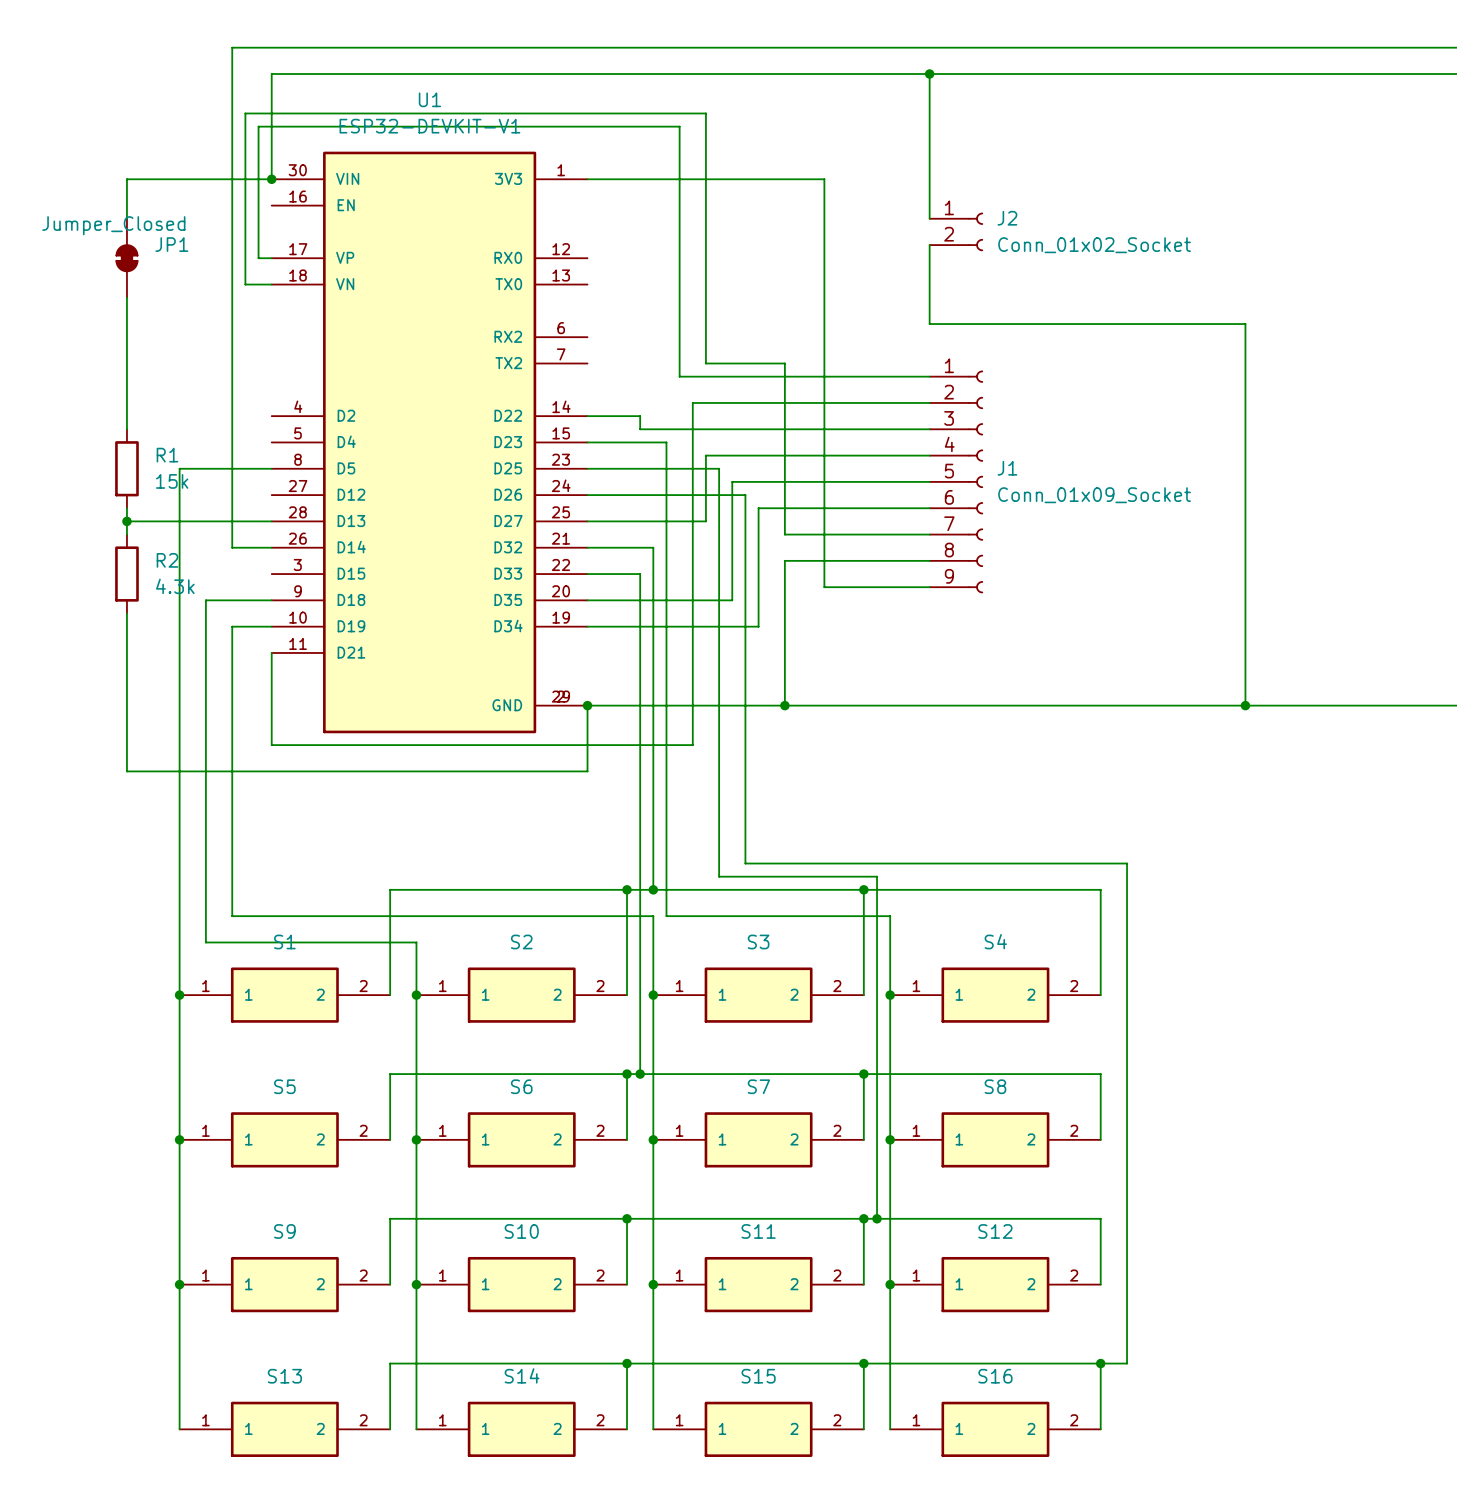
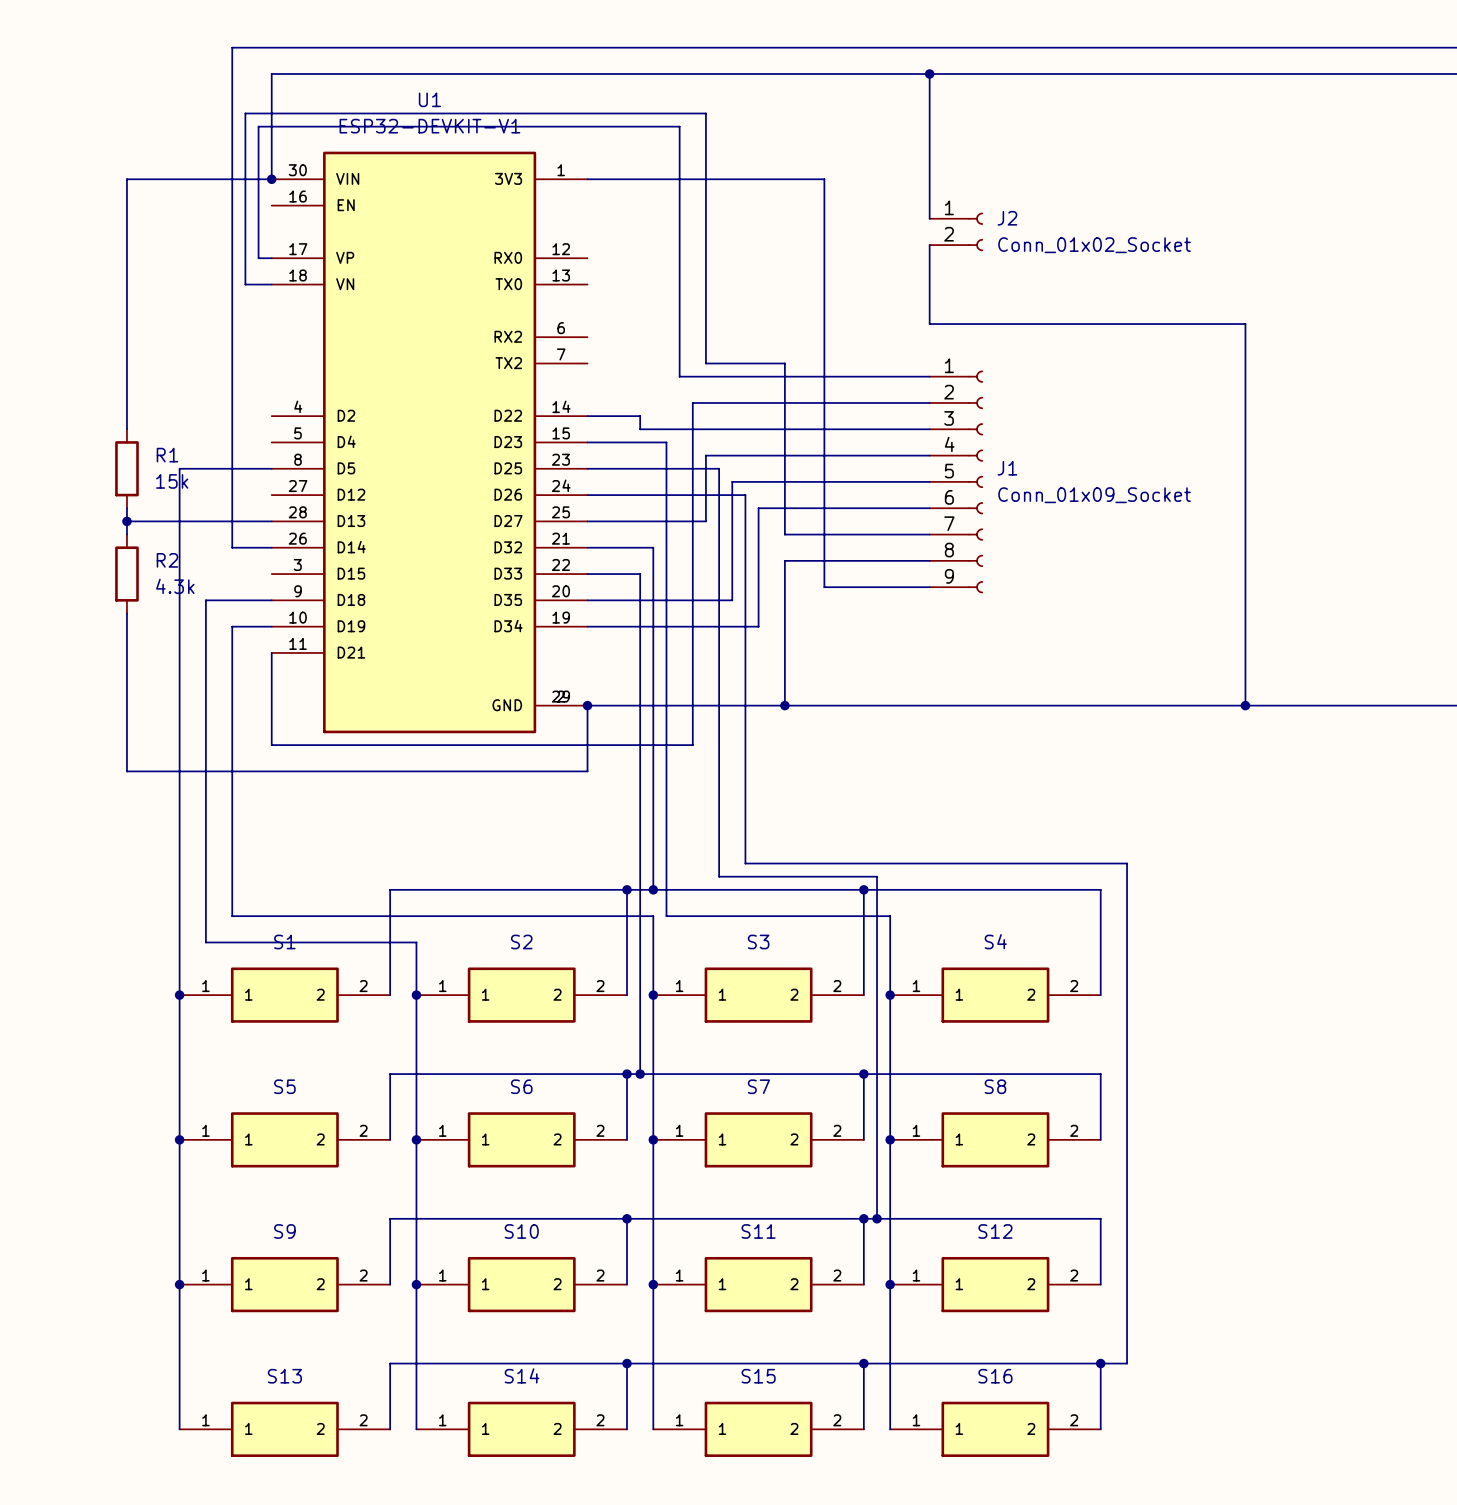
JP1: Jumper_Closed (126, 258) -> none

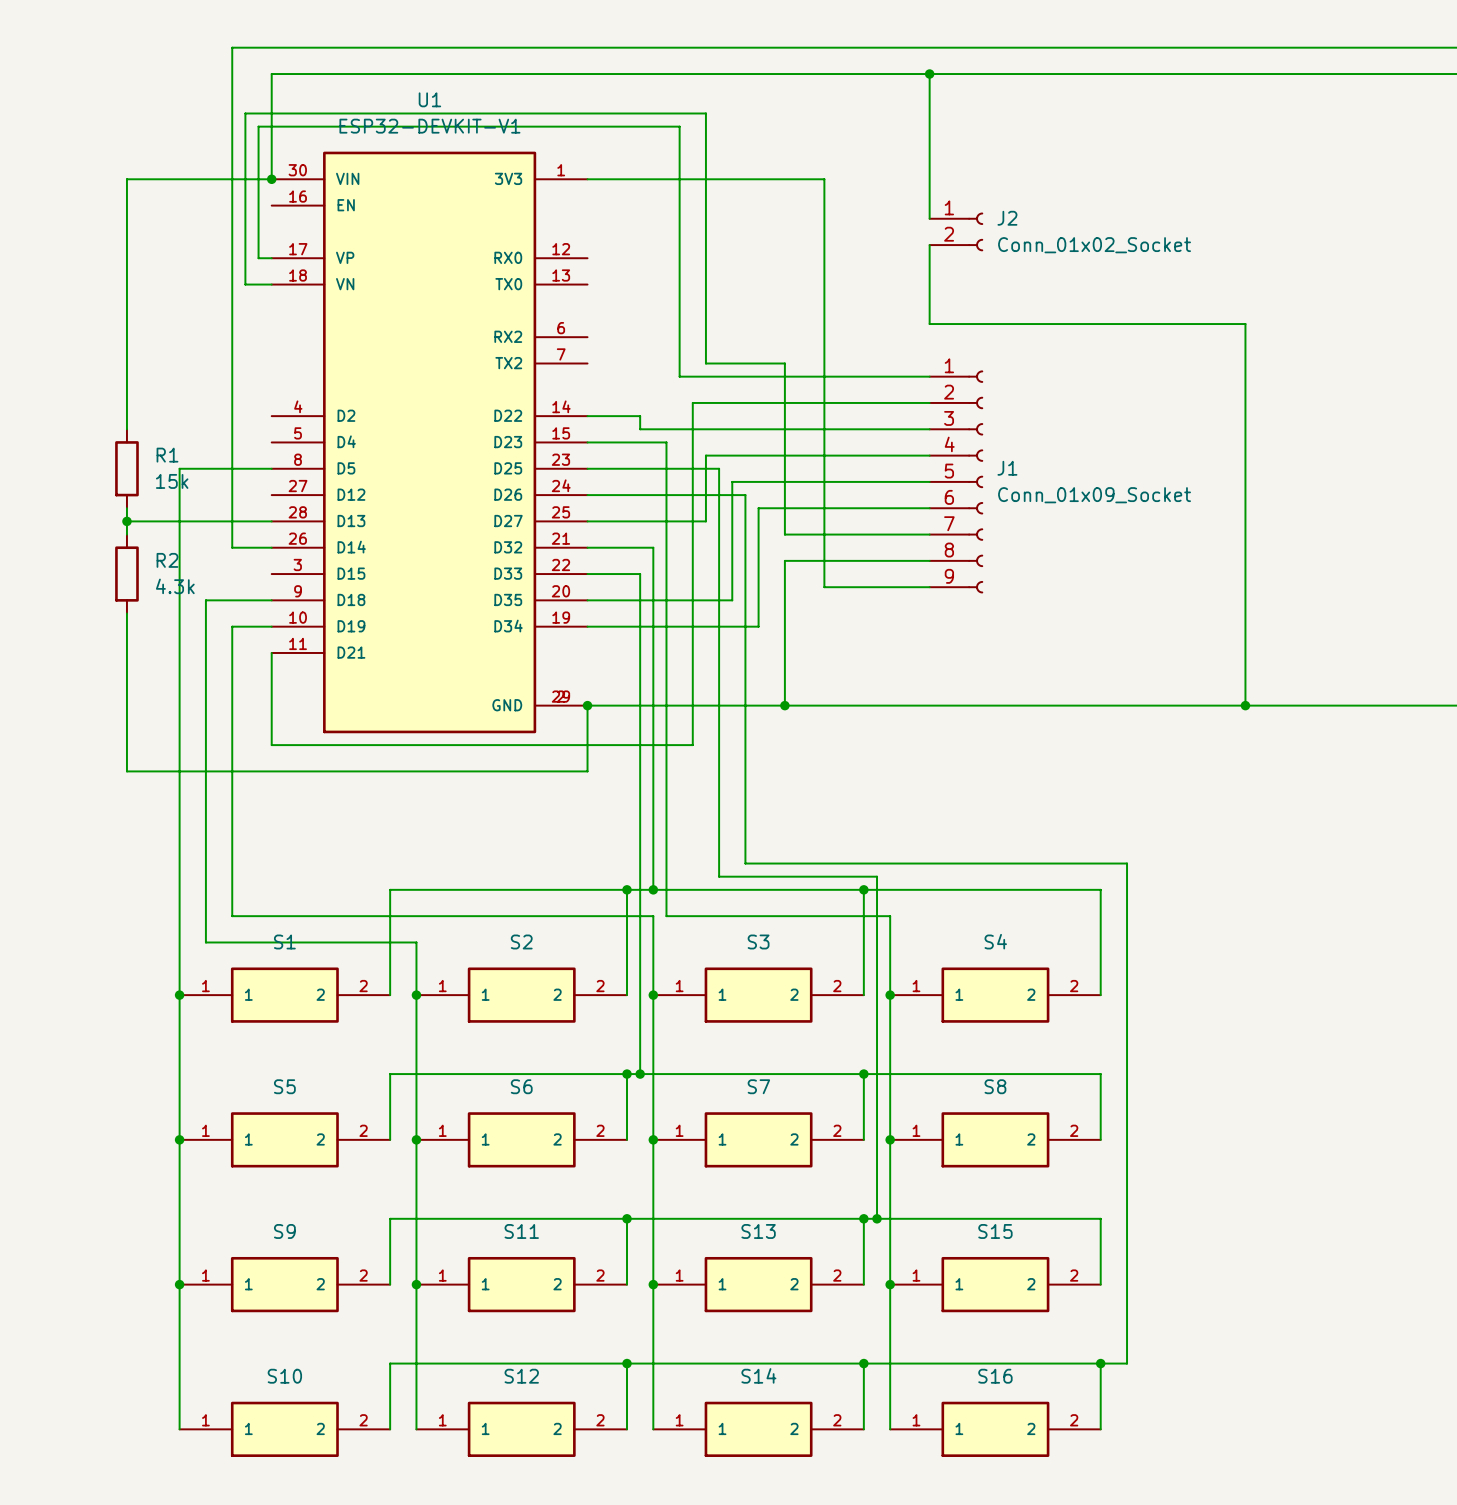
S10 name: S10 (521, 1231) -> S11 (521, 1231)
S11 name: S11 (758, 1231) -> S13 (758, 1231)
S12 name: S12 (995, 1231) -> S15 (995, 1231)
S14 name: S14 (522, 1375) -> S12 (521, 1376)
S13 name: S13 (284, 1376) -> S10 (284, 1376)
S15 name: S15 (758, 1376) -> S14 (758, 1375)

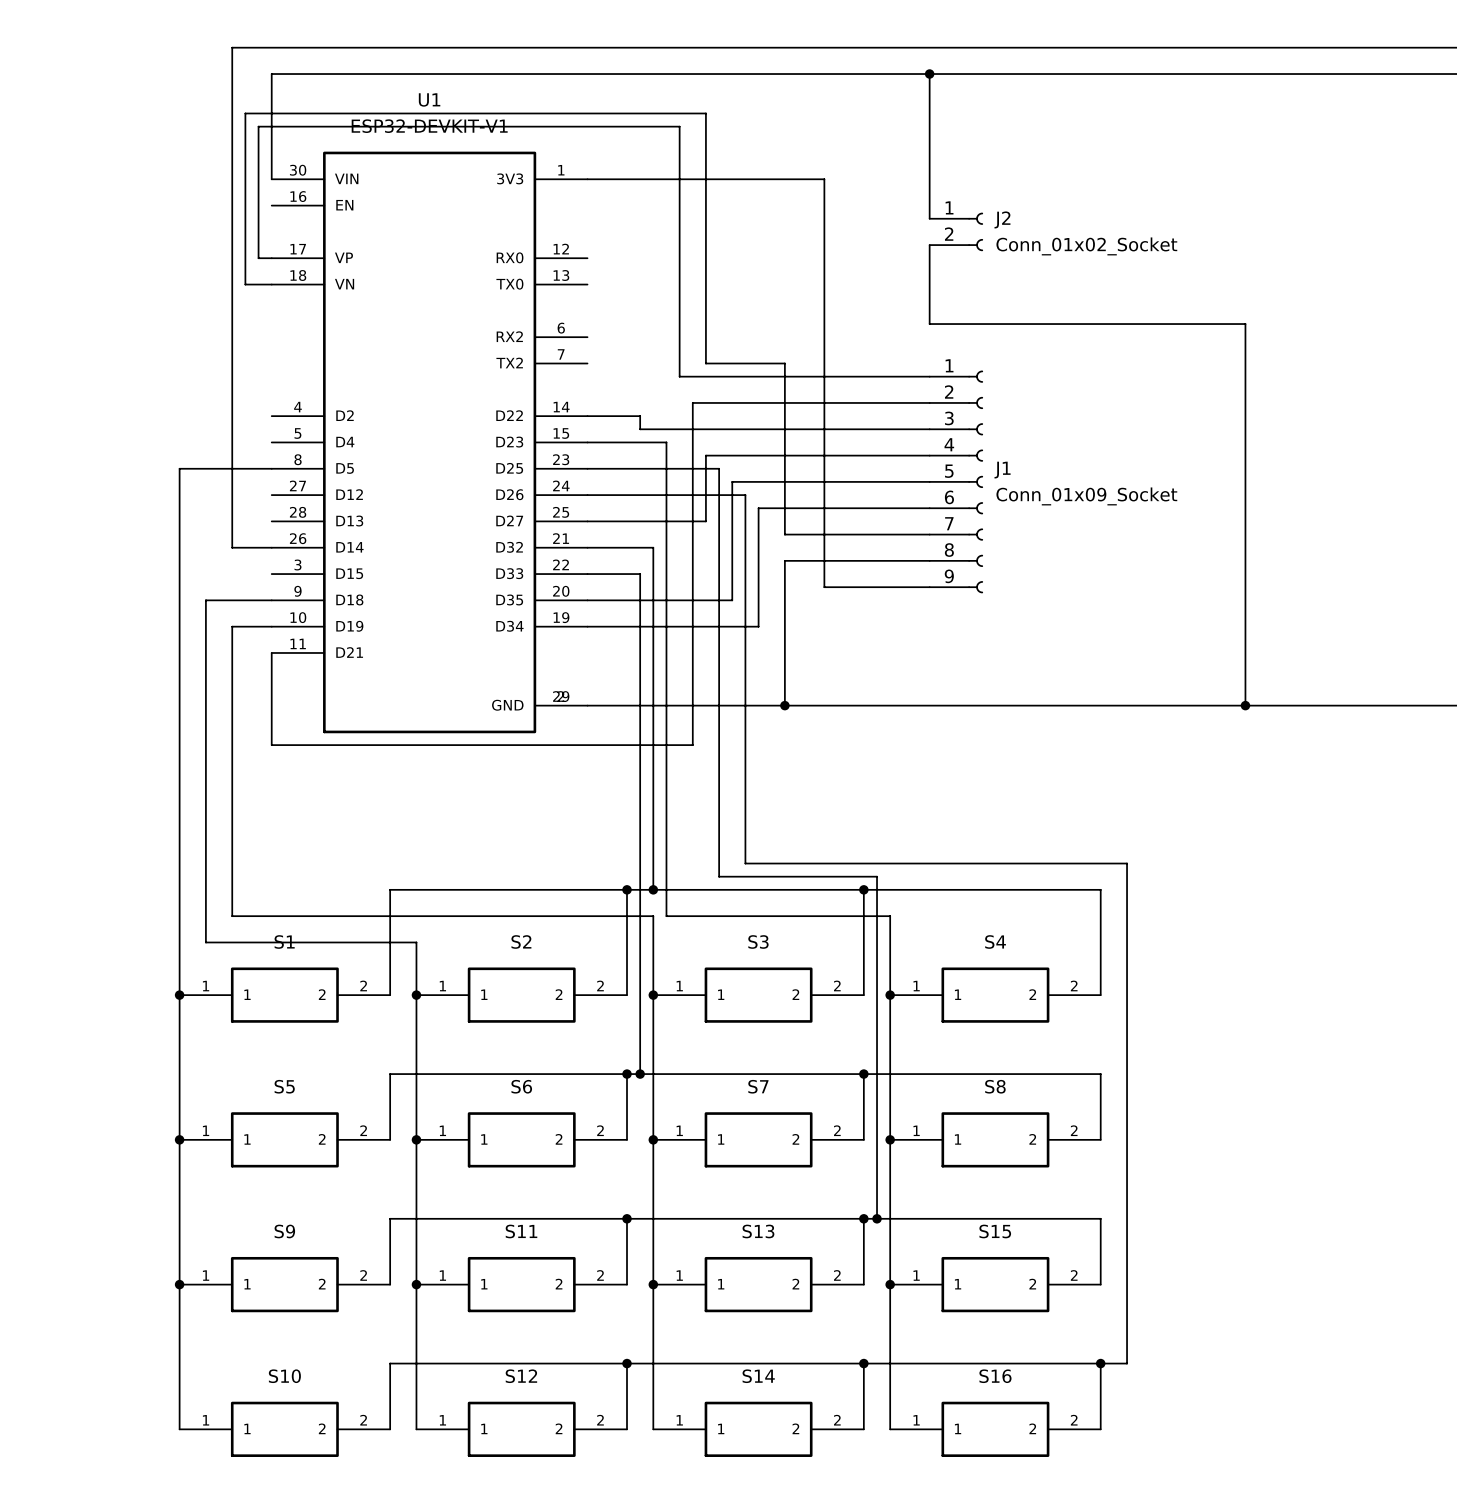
wire: (271, 179) (126, 179) (126, 429) -> none
junction: (271, 179) -> none
R1: 15k (126, 468) -> none
wire: (126, 508) (126, 534) -> none
wire: (126, 521) (271, 521) -> none
junction: (126, 521) -> none
R2: 4.3k (126, 574) -> none
wire: (126, 613) (126, 771) (587, 771) (587, 705) -> none
junction: (587, 705) -> none

